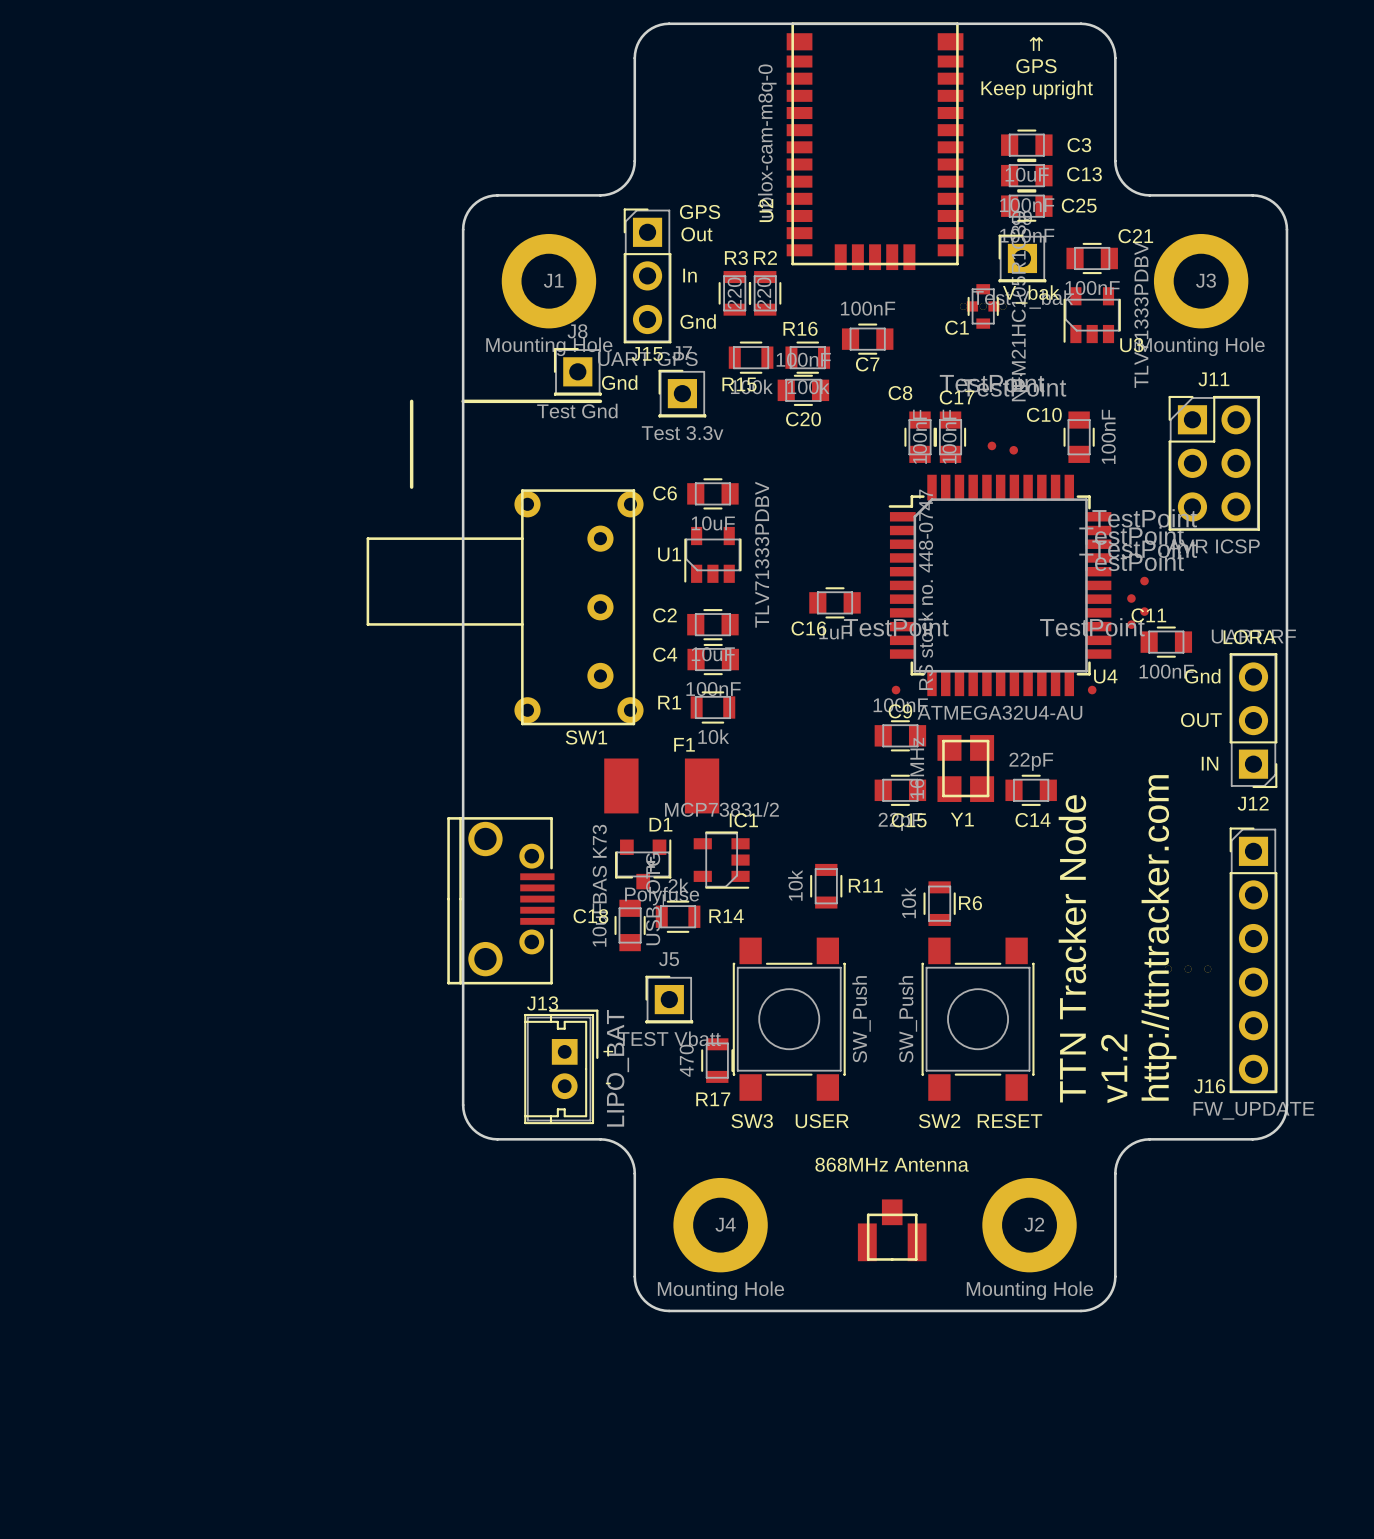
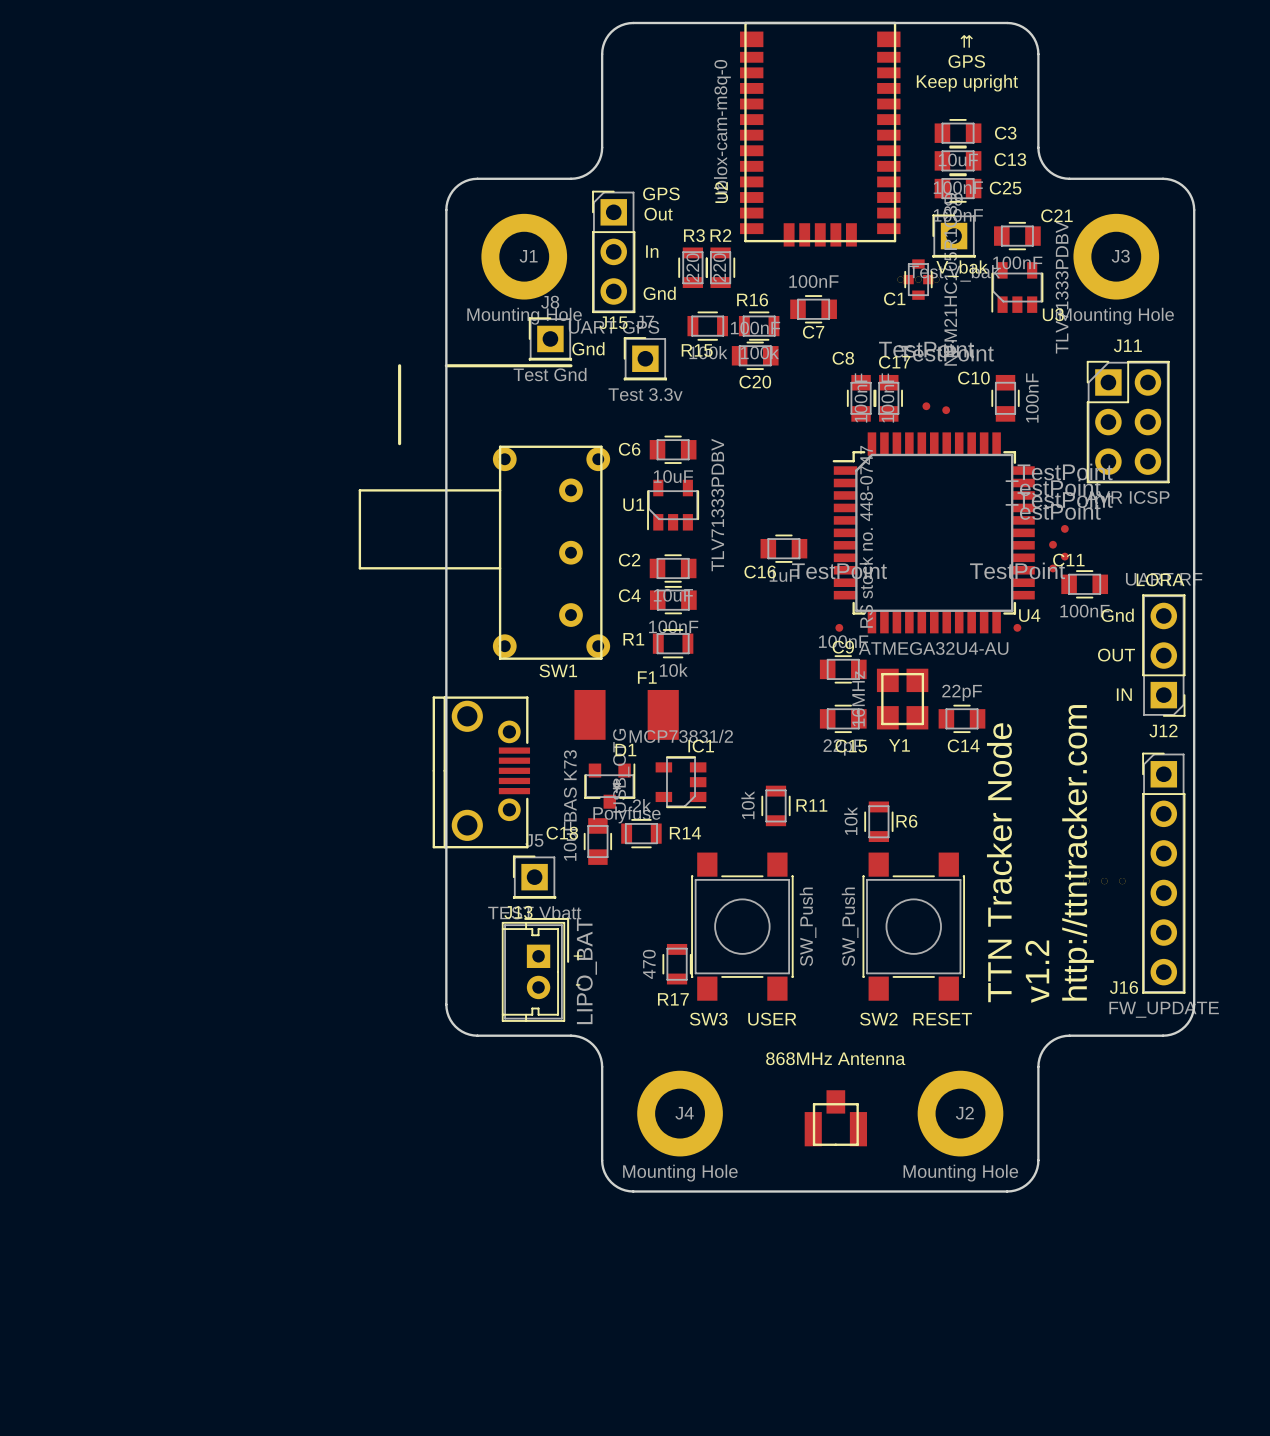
part position: (500, 900) -> (481, 772)
J5 position: (669, 999) -> (534, 877)

